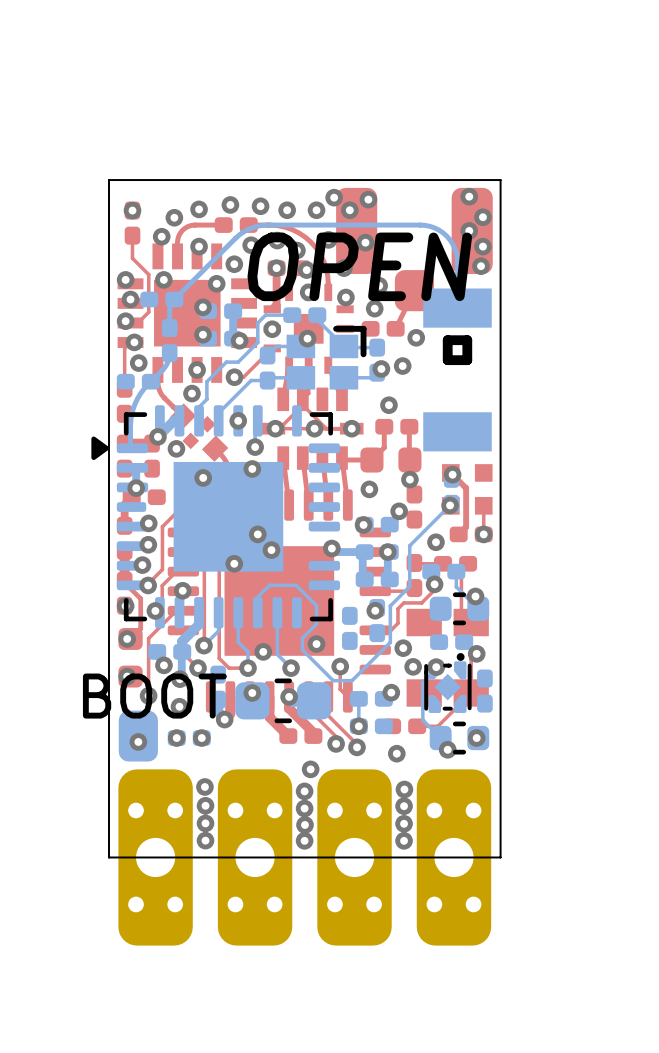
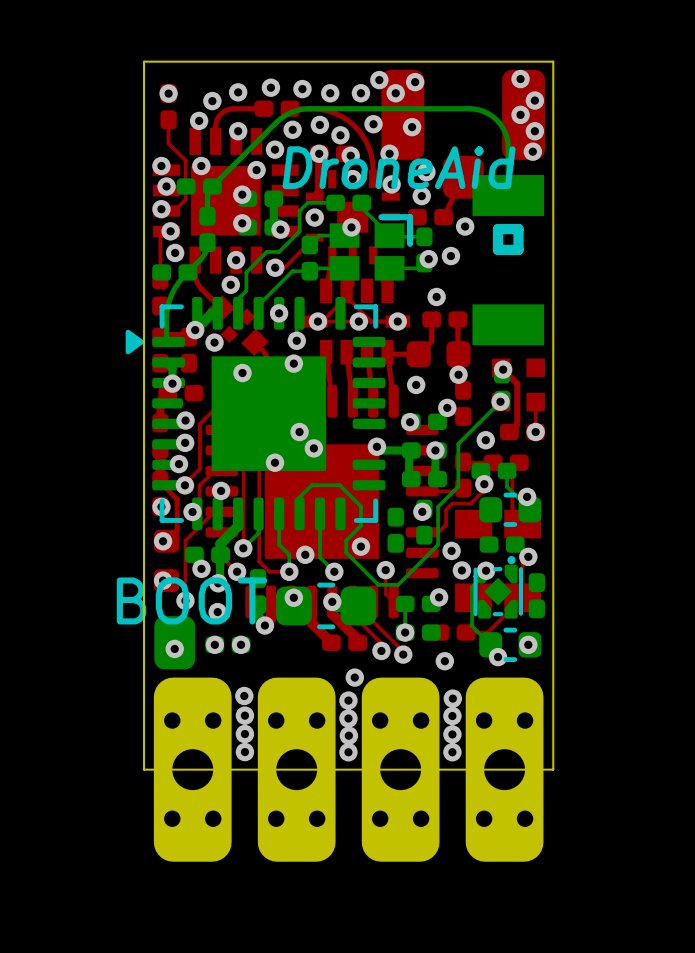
text: OPEN (359, 266) -> DroneAid (399, 167)

